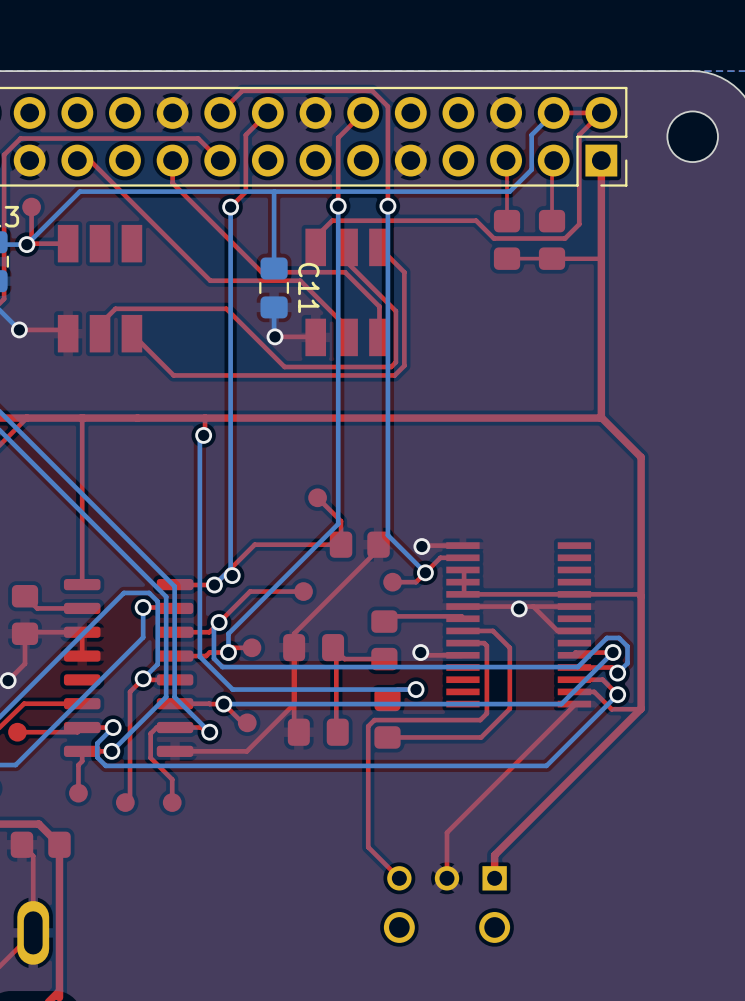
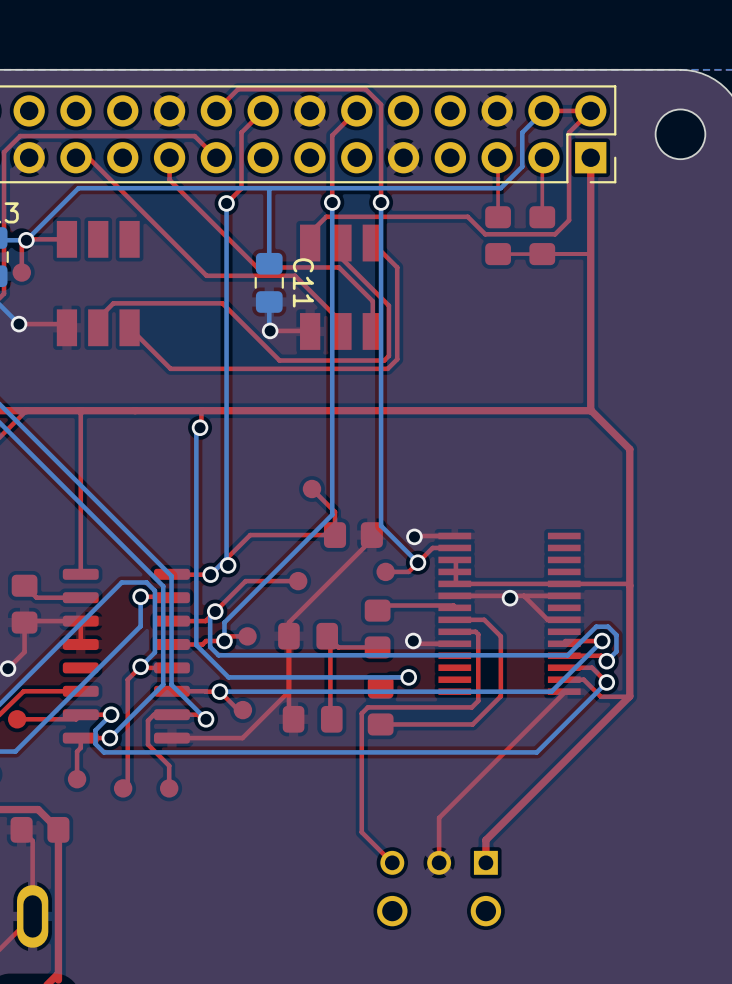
top track: (31, 207) (31, 239) (26, 244) -> none
part position: (31, 207) -> (21, 272)
top track: none -> (22, 239) (21, 272)

